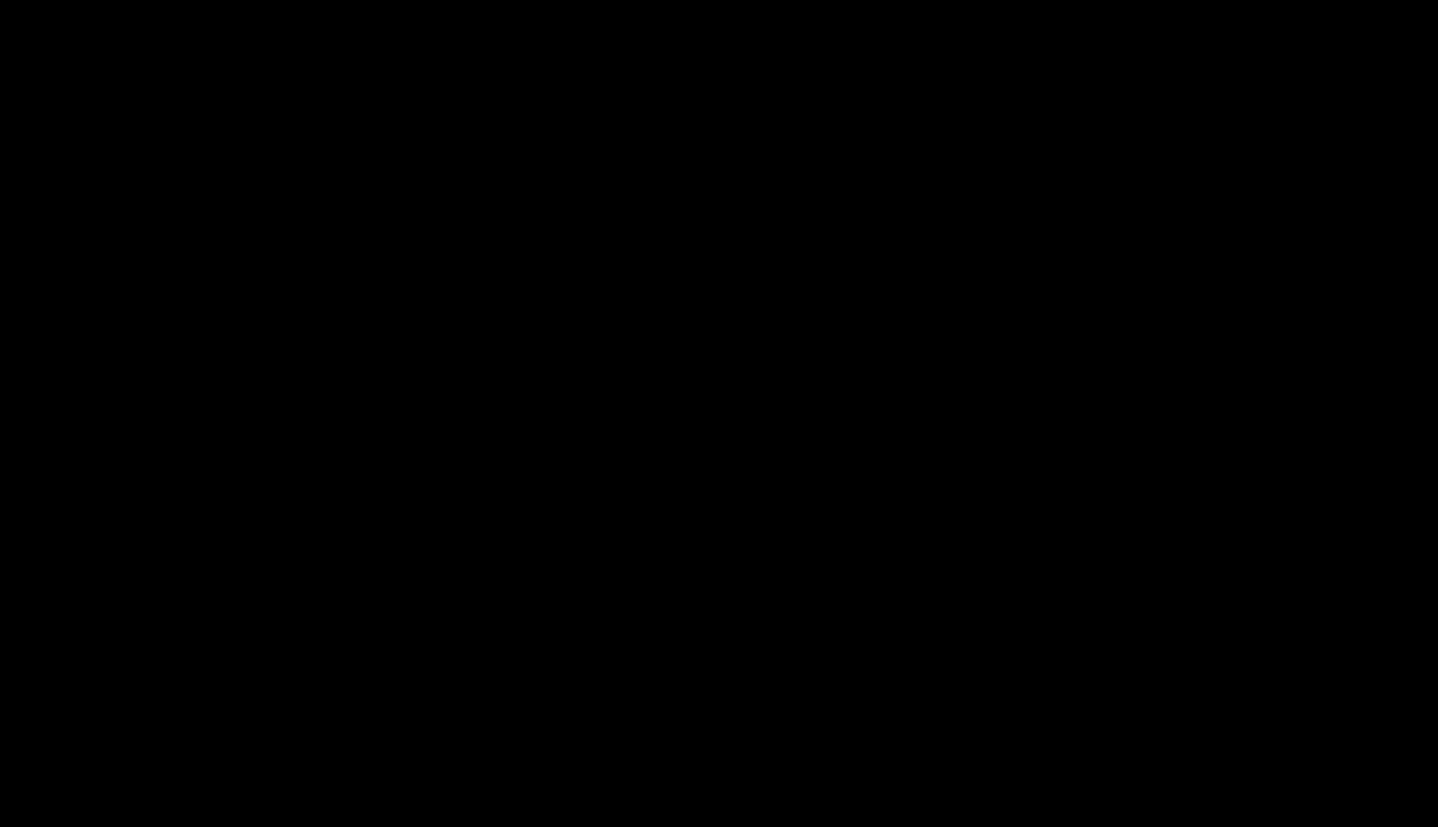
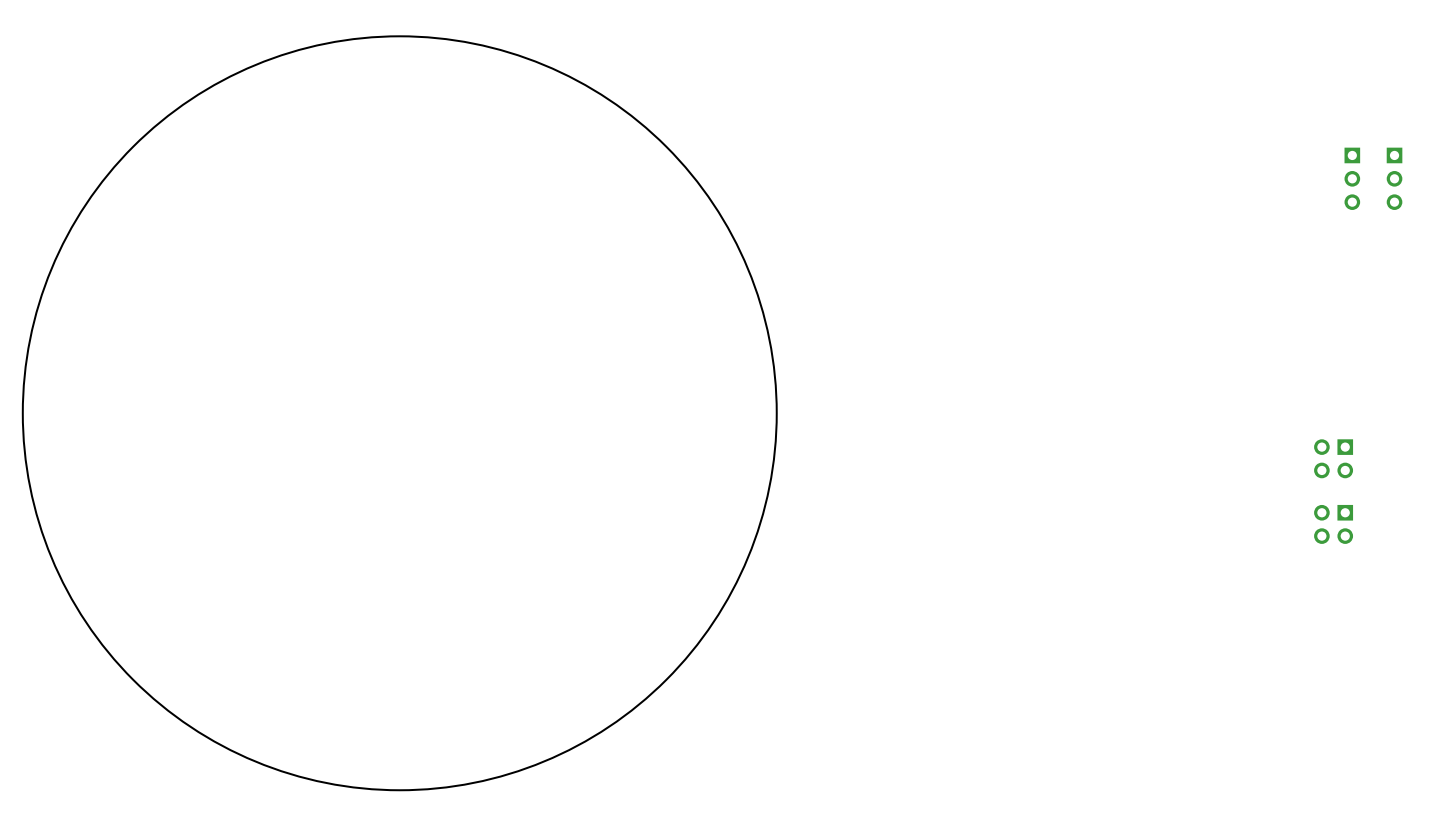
round board edge: none -> [21, 35, 778, 792]
part: none -> (1352, 178)
part: none -> (1394, 178)
part: none -> (1333, 458)
part: none -> (1333, 524)

